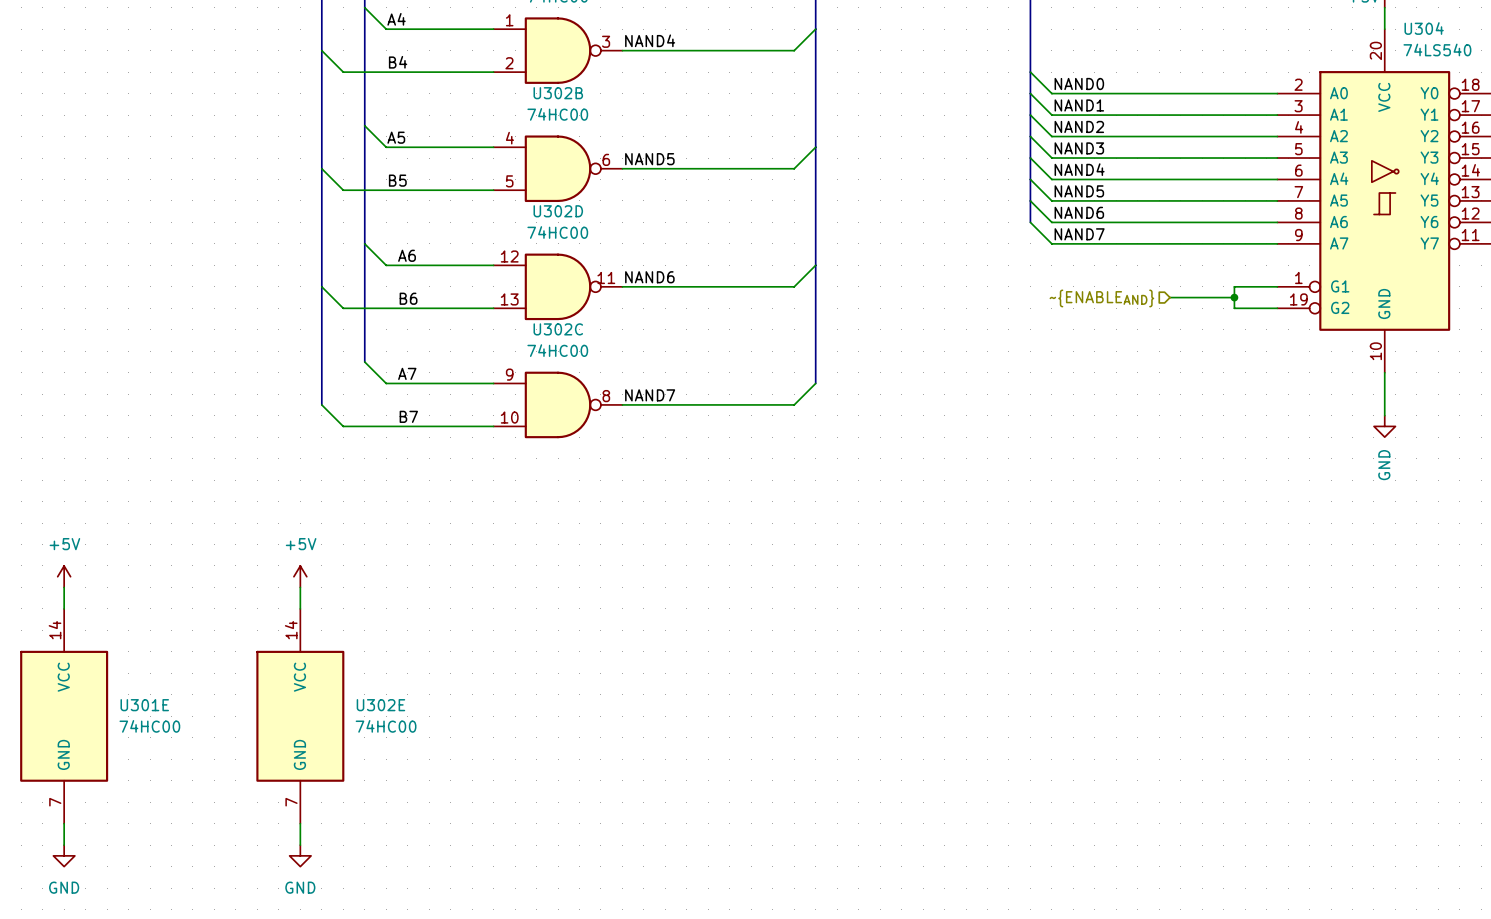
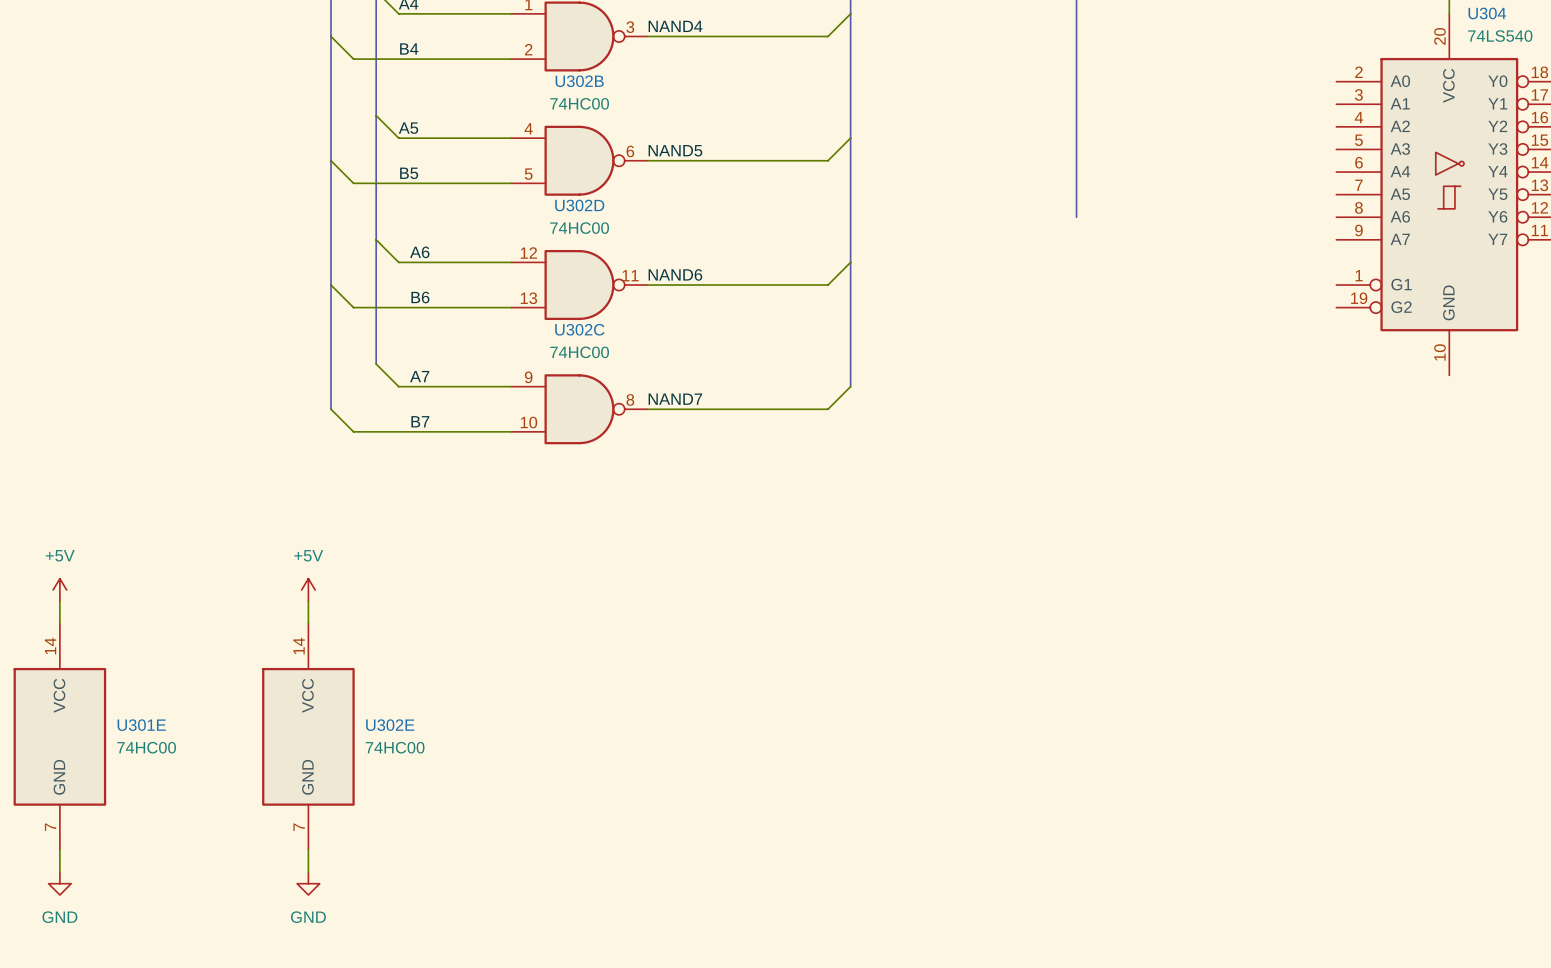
wire: (1030, 72) (1051, 93) (1277, 93) -> none
label: NAND0 (1079, 84) -> none
wire: (1030, 93) (1051, 115) (1277, 115) -> none
label: NAND1 (1079, 105) -> none
wire: (1030, 115) (1051, 136) (1277, 136) -> none
label: NAND2 (1079, 126) -> none
wire: (1030, 136) (1051, 158) (1277, 158) -> none
label: NAND3 (1079, 148) -> none
wire: (1030, 158) (1051, 179) (1277, 179) -> none
label: NAND4 (1079, 169) -> none
wire: (1030, 179) (1051, 200) (1277, 200) -> none
label: NAND5 (1079, 191) -> none
wire: (1030, 200) (1051, 222) (1277, 222) -> none
label: NAND6 (1079, 212) -> none
wire: (1030, 222) (1051, 243) (1277, 243) -> none
label: NAND7 (1079, 234) -> none
wire: (1277, 286) (1234, 286) (1234, 308) (1277, 308) -> none
wire: (1170, 297) (1234, 297) -> none
junction: (1234, 297) -> none
hierarchical label: ~{ENABLEAND} (1101, 298) -> none
wire: (1384, 372) (1384, 415) -> none
power symbol: GND (1384, 426) -> none

